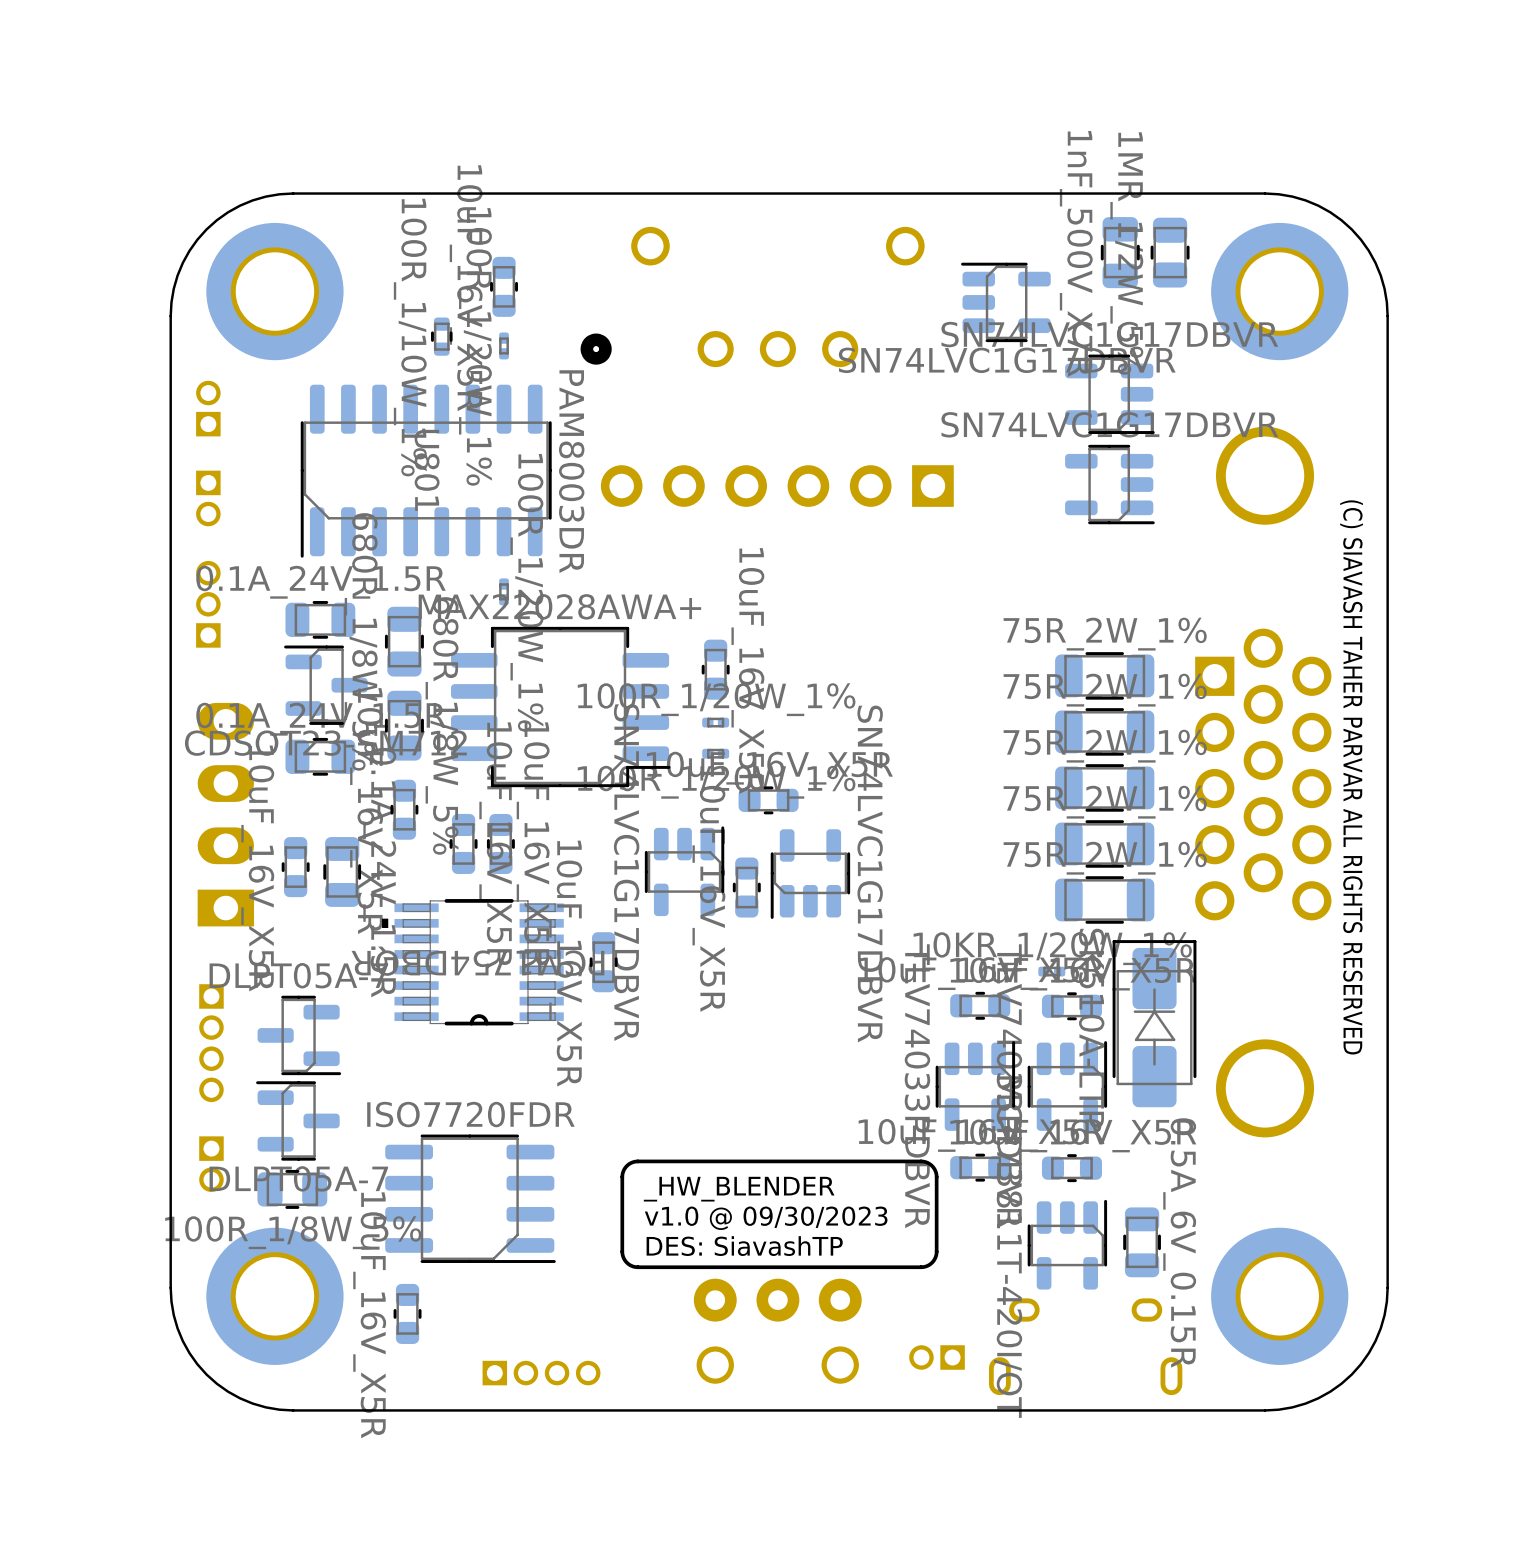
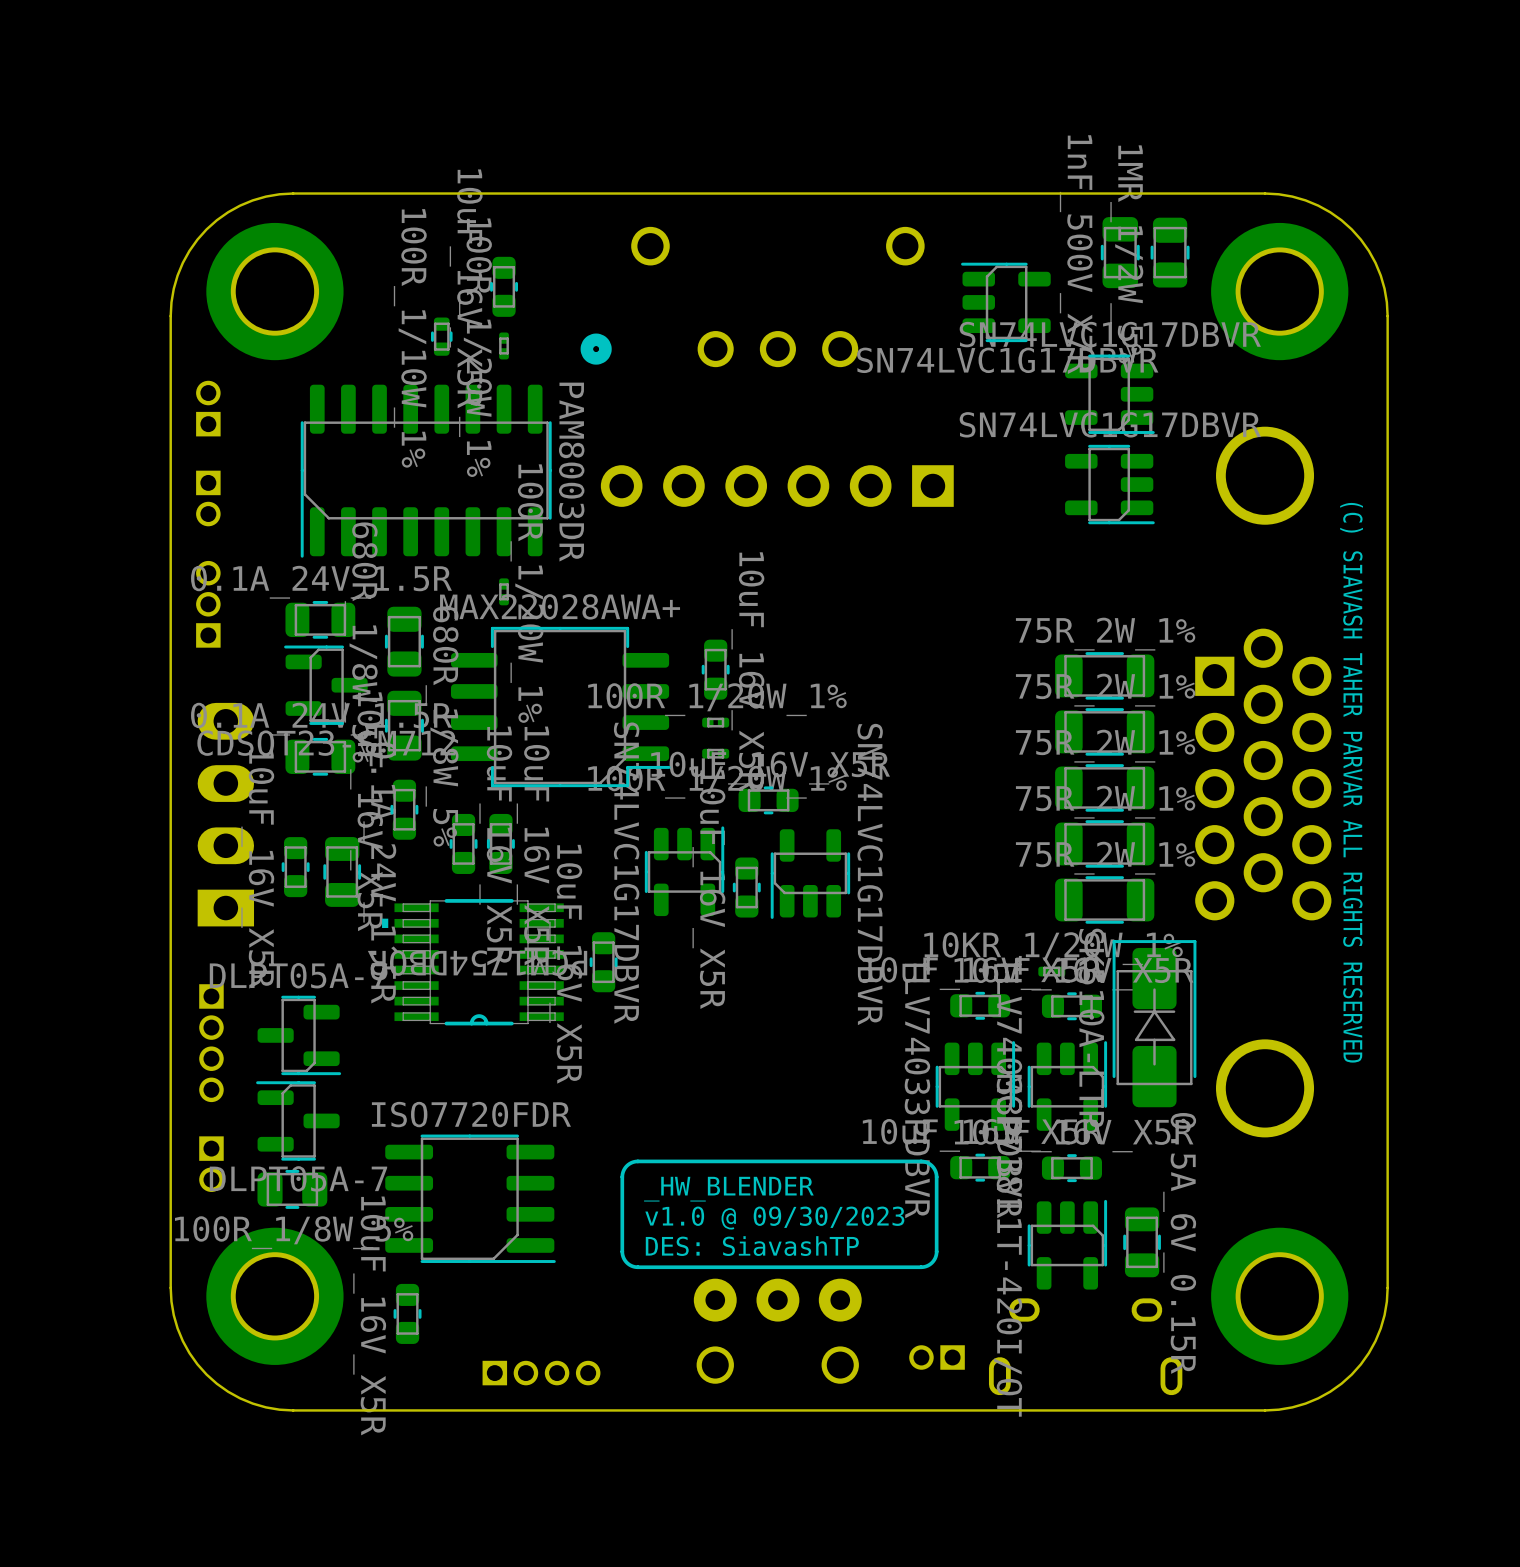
U801 name: U801 (427, 470) -> none

